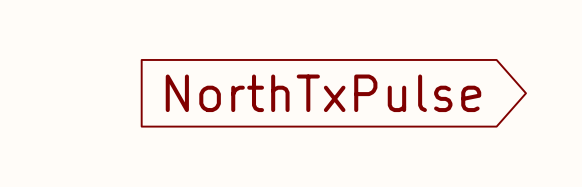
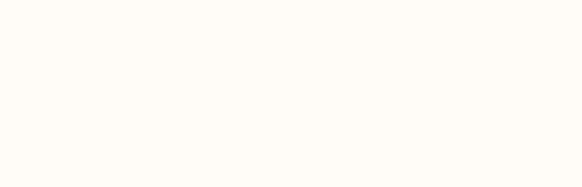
global label: NorthTxPulse (323, 93) -> none

